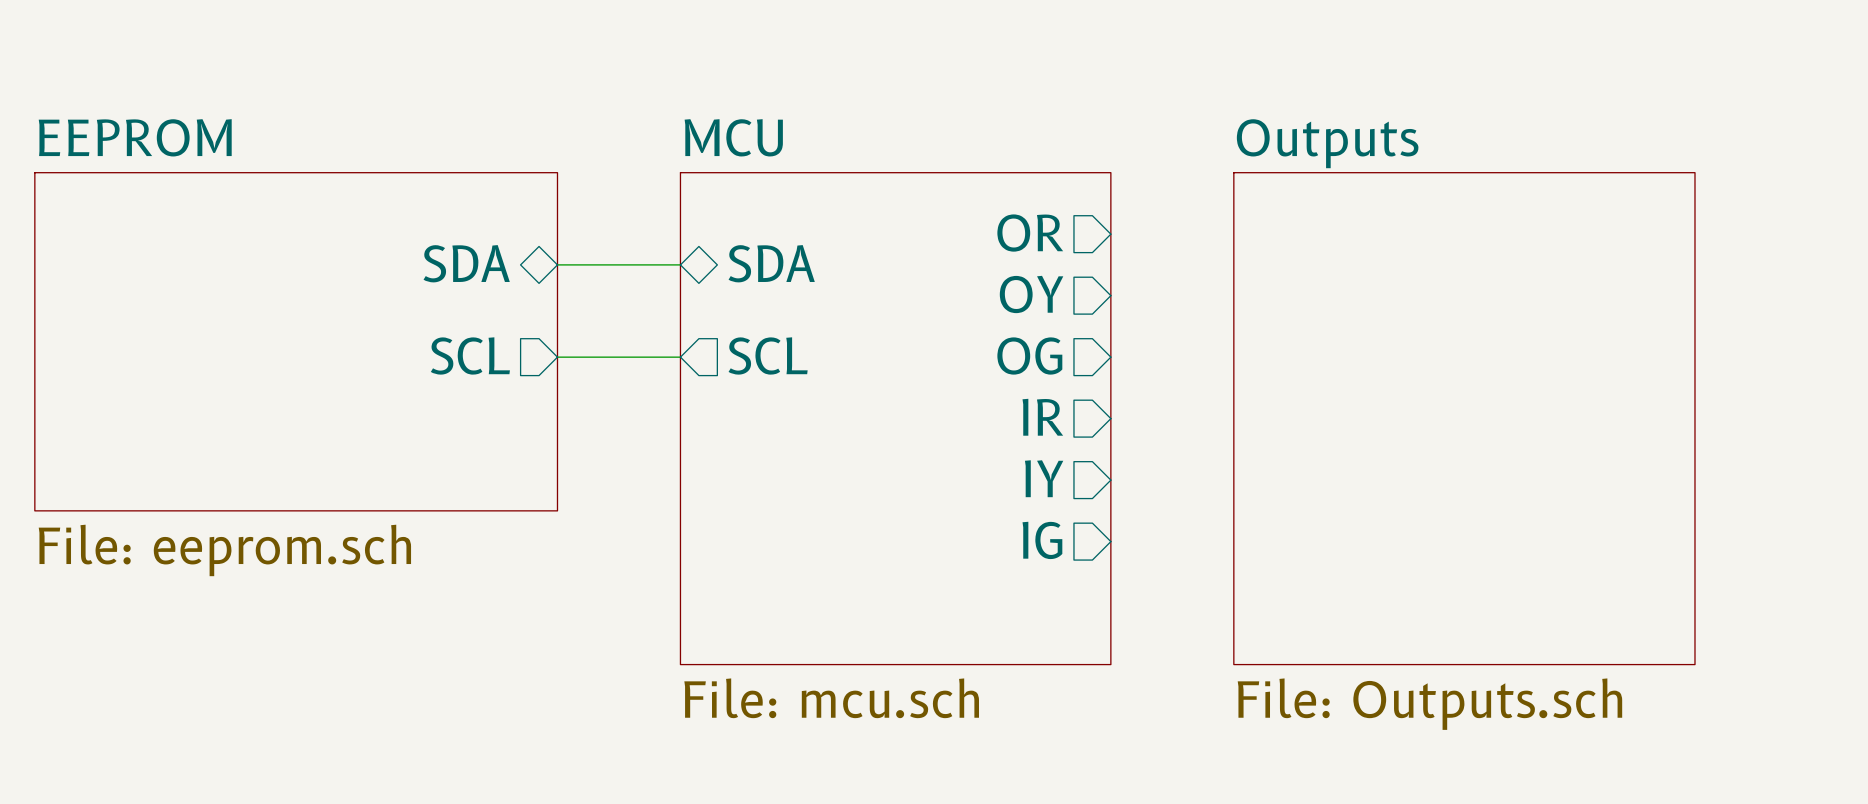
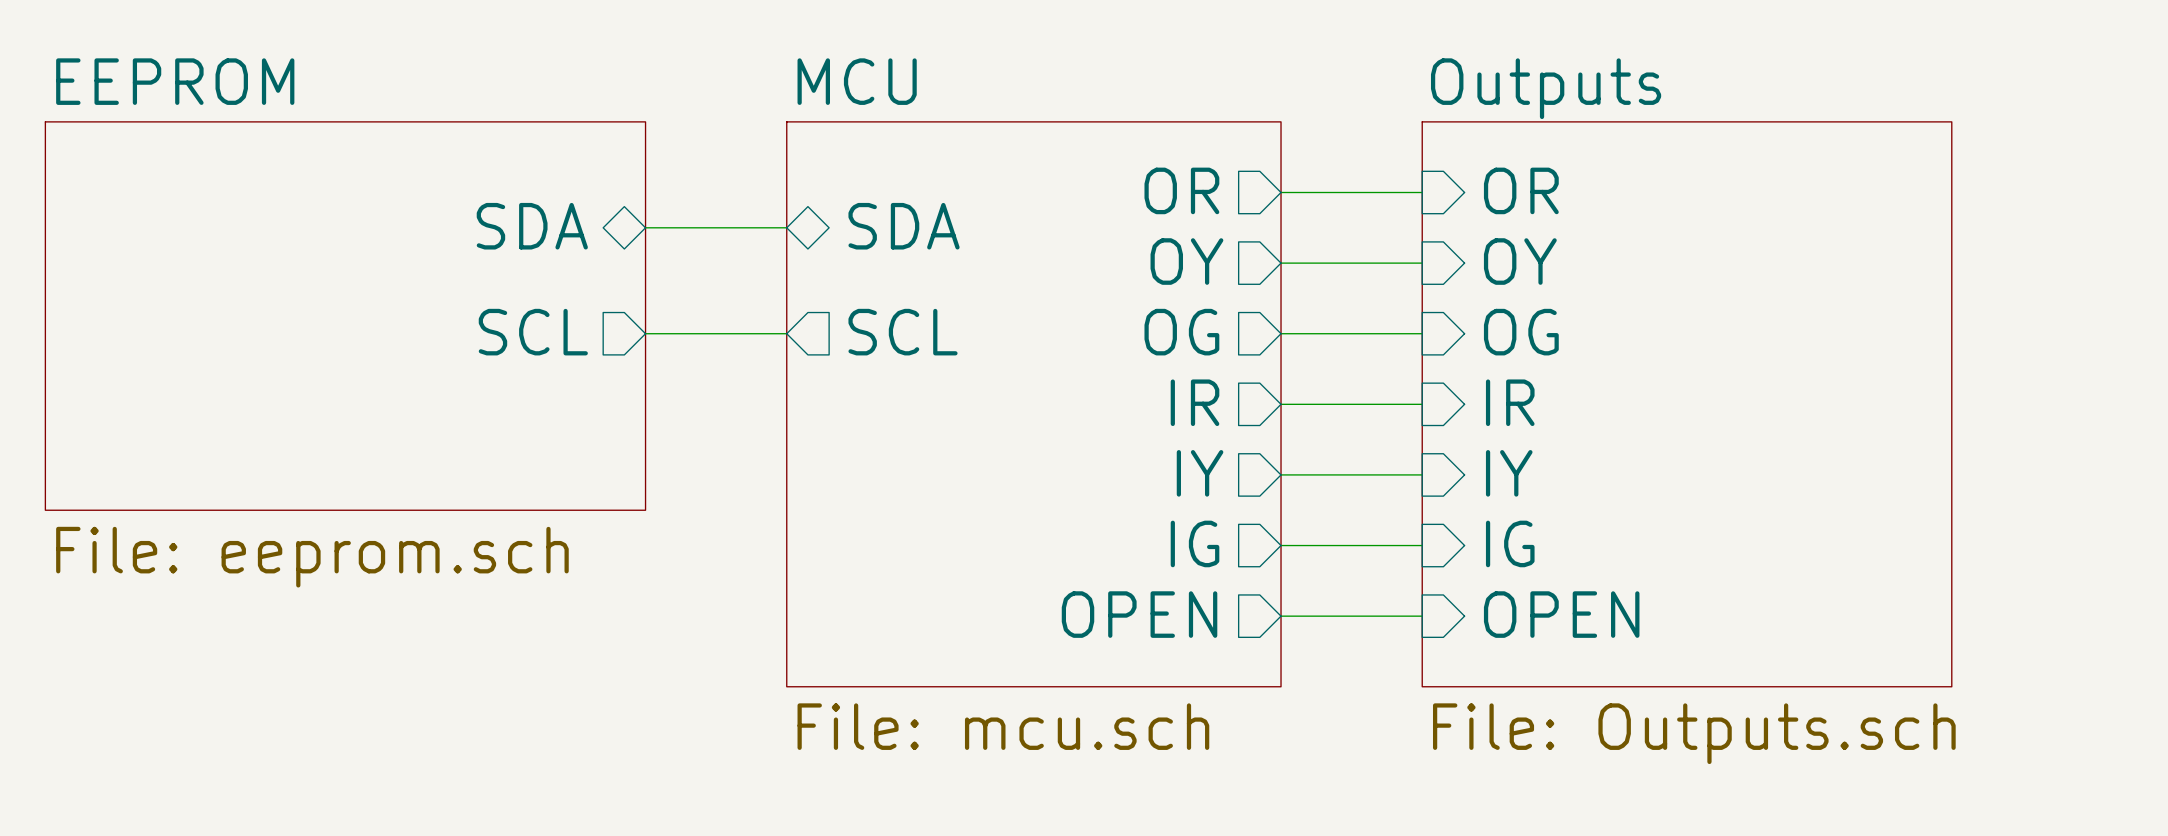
sheet pin: none -> OR (1521, 190)
wire: none -> (1281, 192) (1422, 192)
sheet pin: none -> OY (1520, 261)
wire: none -> (1281, 263) (1422, 263)
sheet pin: none -> OG (1521, 332)
wire: none -> (1281, 333) (1422, 333)
sheet pin: none -> IR (1510, 402)
wire: none -> (1281, 404) (1422, 404)
sheet pin: none -> IY (1509, 473)
wire: none -> (1281, 474) (1422, 474)
sheet pin: none -> IG (1510, 543)
wire: none -> (1281, 545) (1422, 545)
sheet pin: none -> OPEN (1139, 614)
sheet pin: none -> OPEN (1561, 614)
wire: none -> (1281, 616) (1422, 616)

